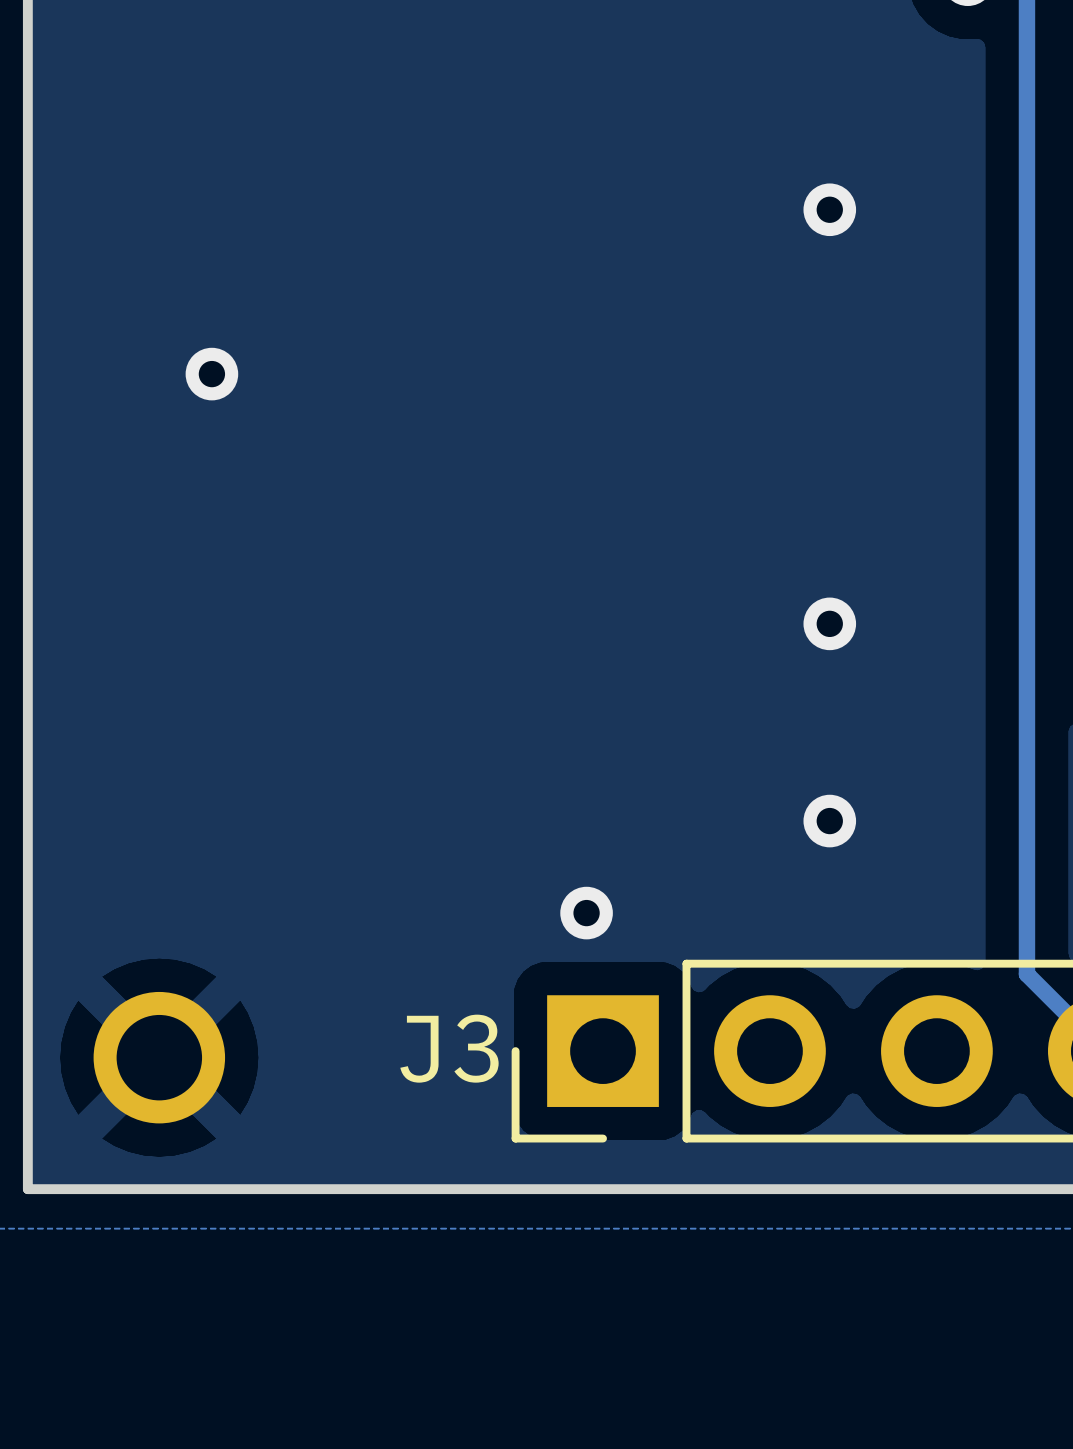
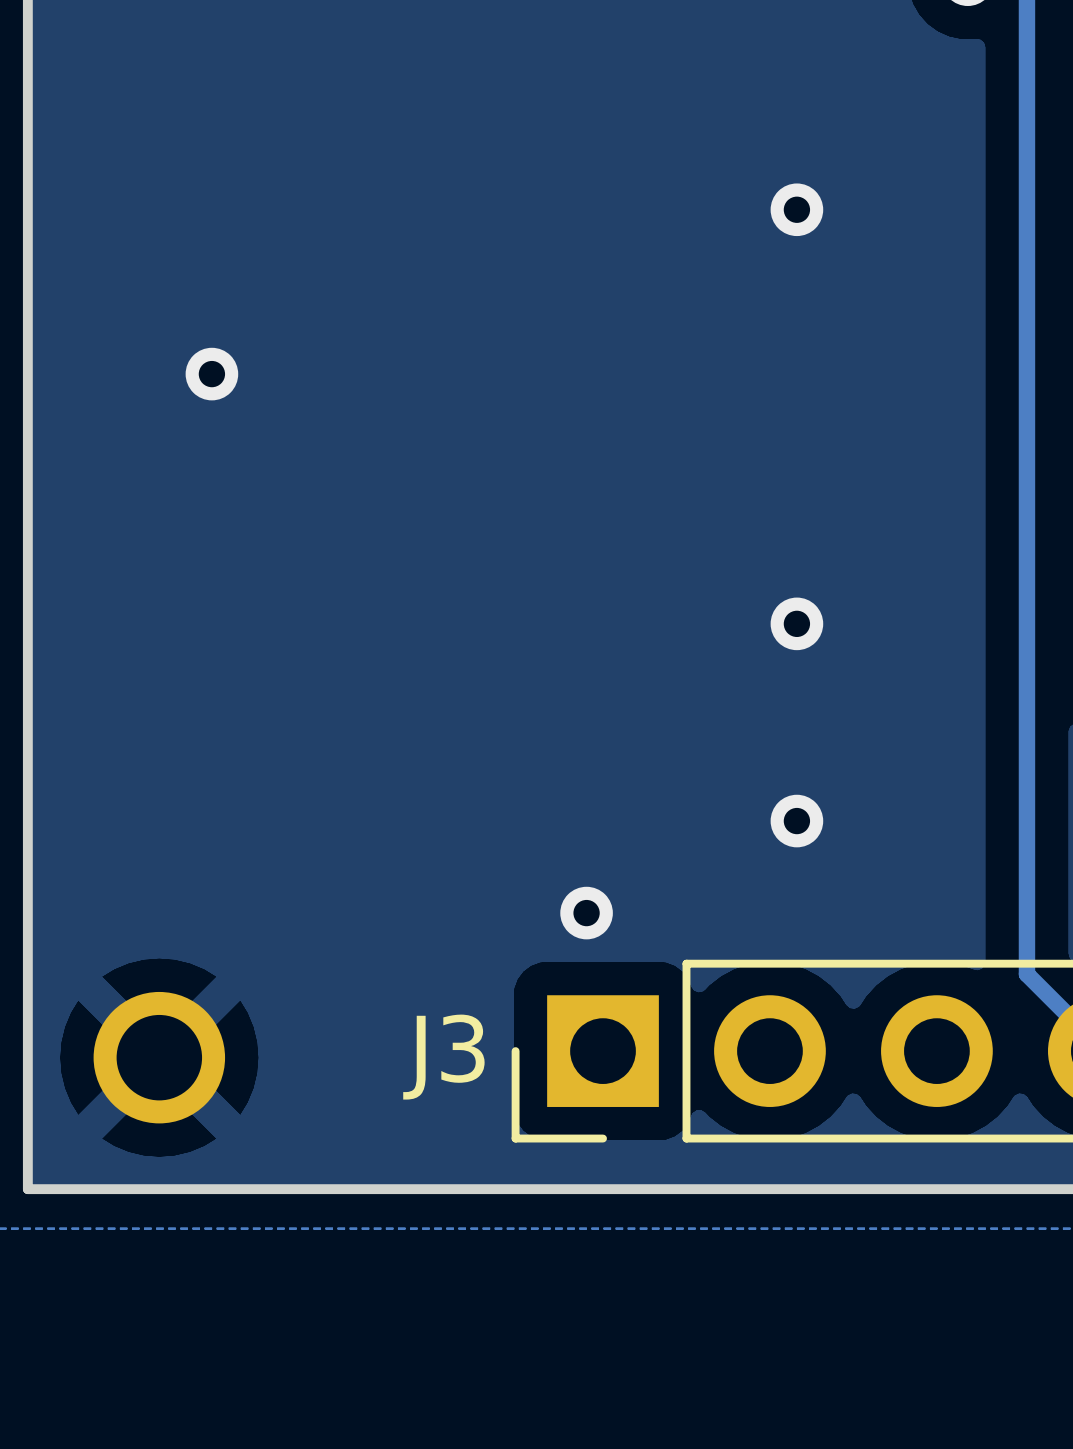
via position: (829, 209) -> (796, 209)
via position: (829, 623) -> (796, 623)
via position: (829, 821) -> (796, 821)

